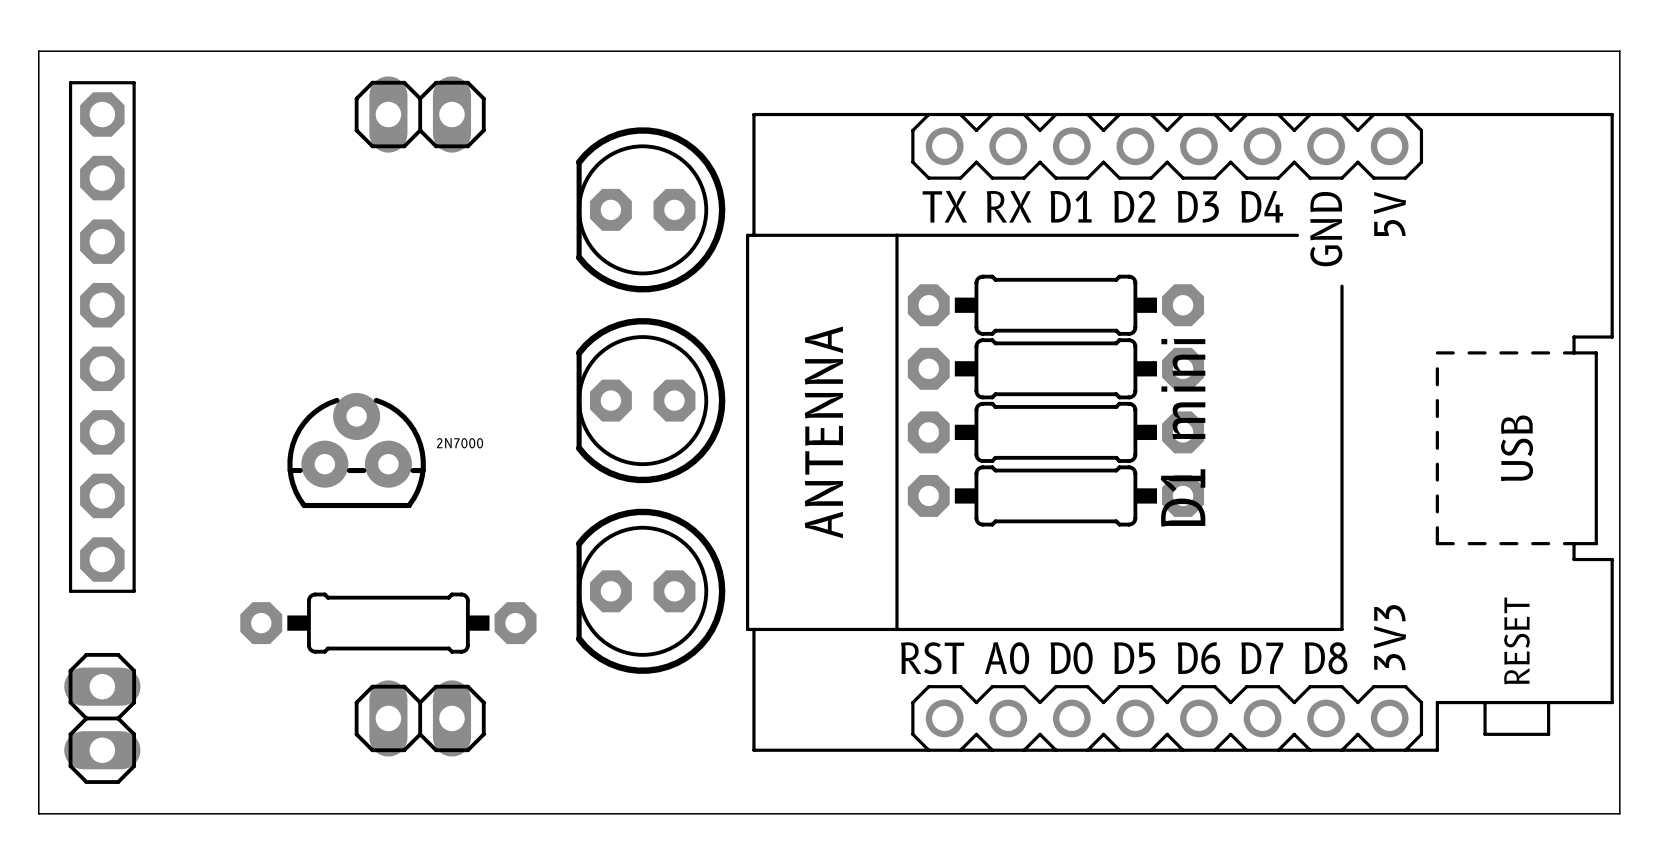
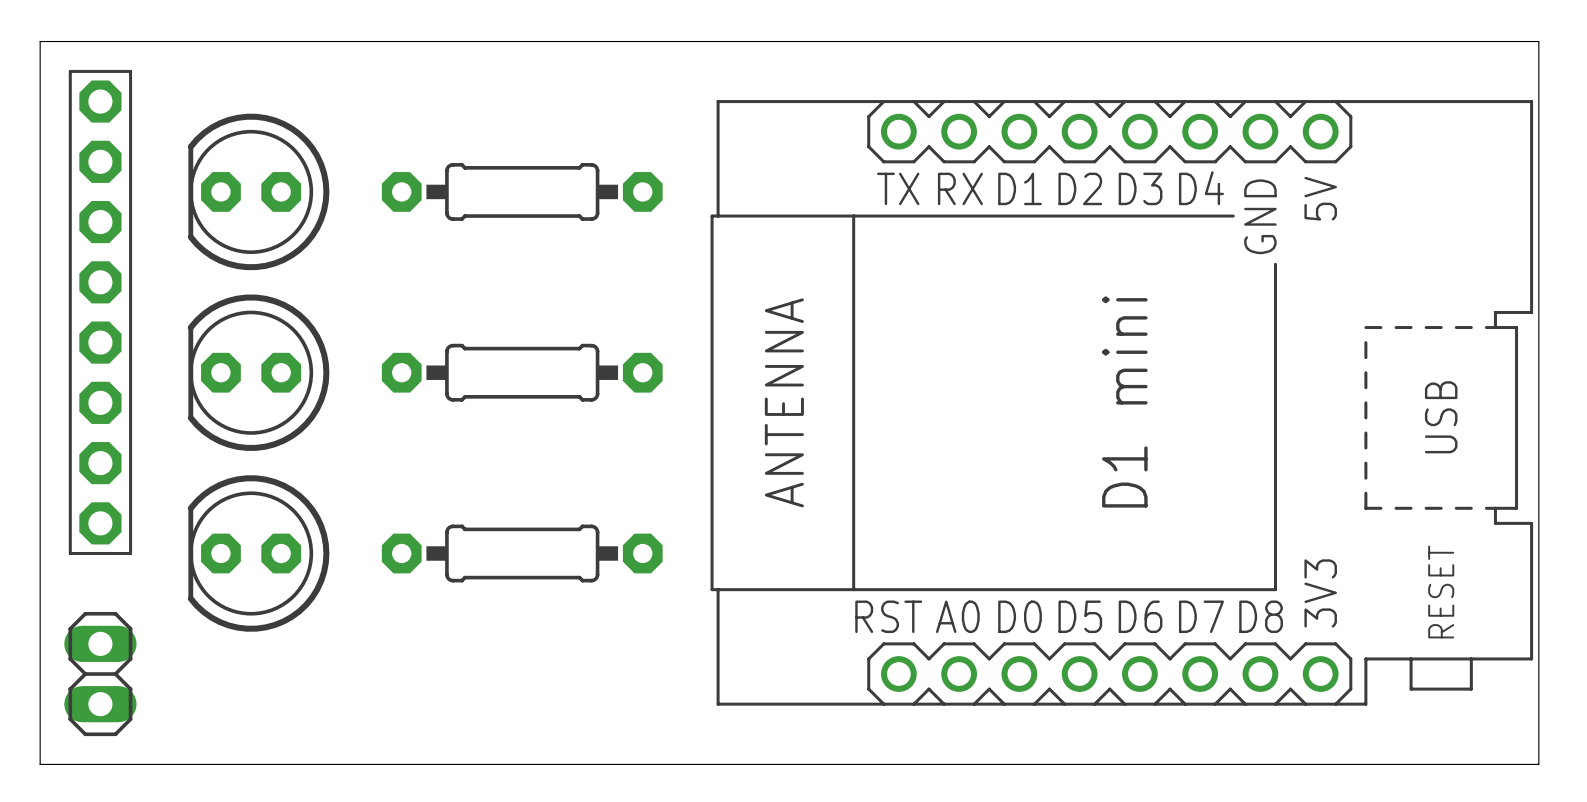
part: (420, 114) -> none
part: none -> (258, 191)
part: none -> (522, 191)
part: (650, 209) -> none
part: (1055, 305) -> none
part: (1055, 368) -> none
part: none -> (258, 372)
part: none -> (522, 372)
part: (650, 400) -> none
part: (1055, 432) -> none
2N7000: (356, 450) -> none
part: (1055, 495) -> none
part: none -> (258, 553)
part: none -> (522, 553)
part: (650, 591) -> none
part: (388, 623) -> none
part: (420, 718) -> none

